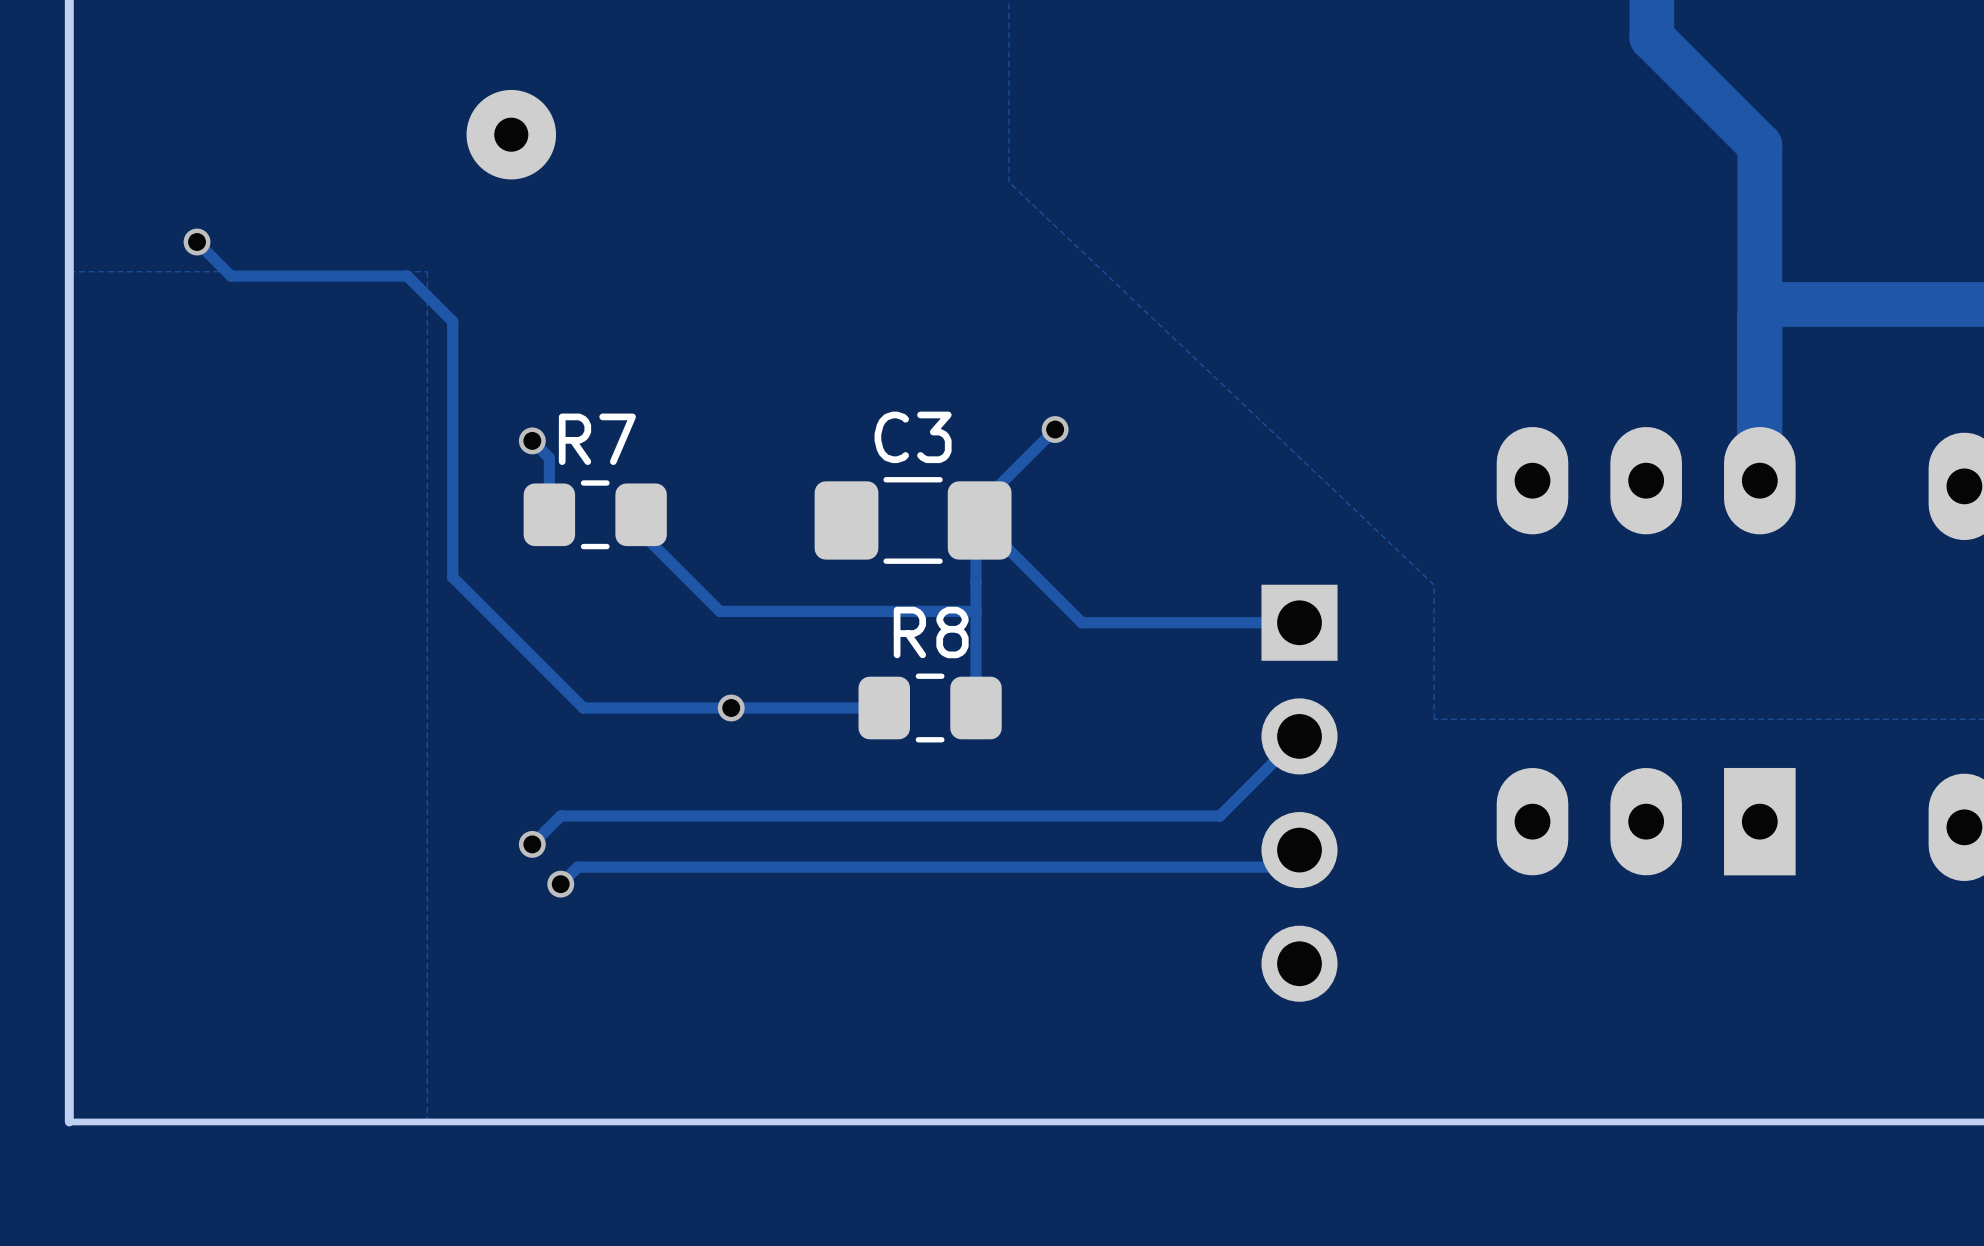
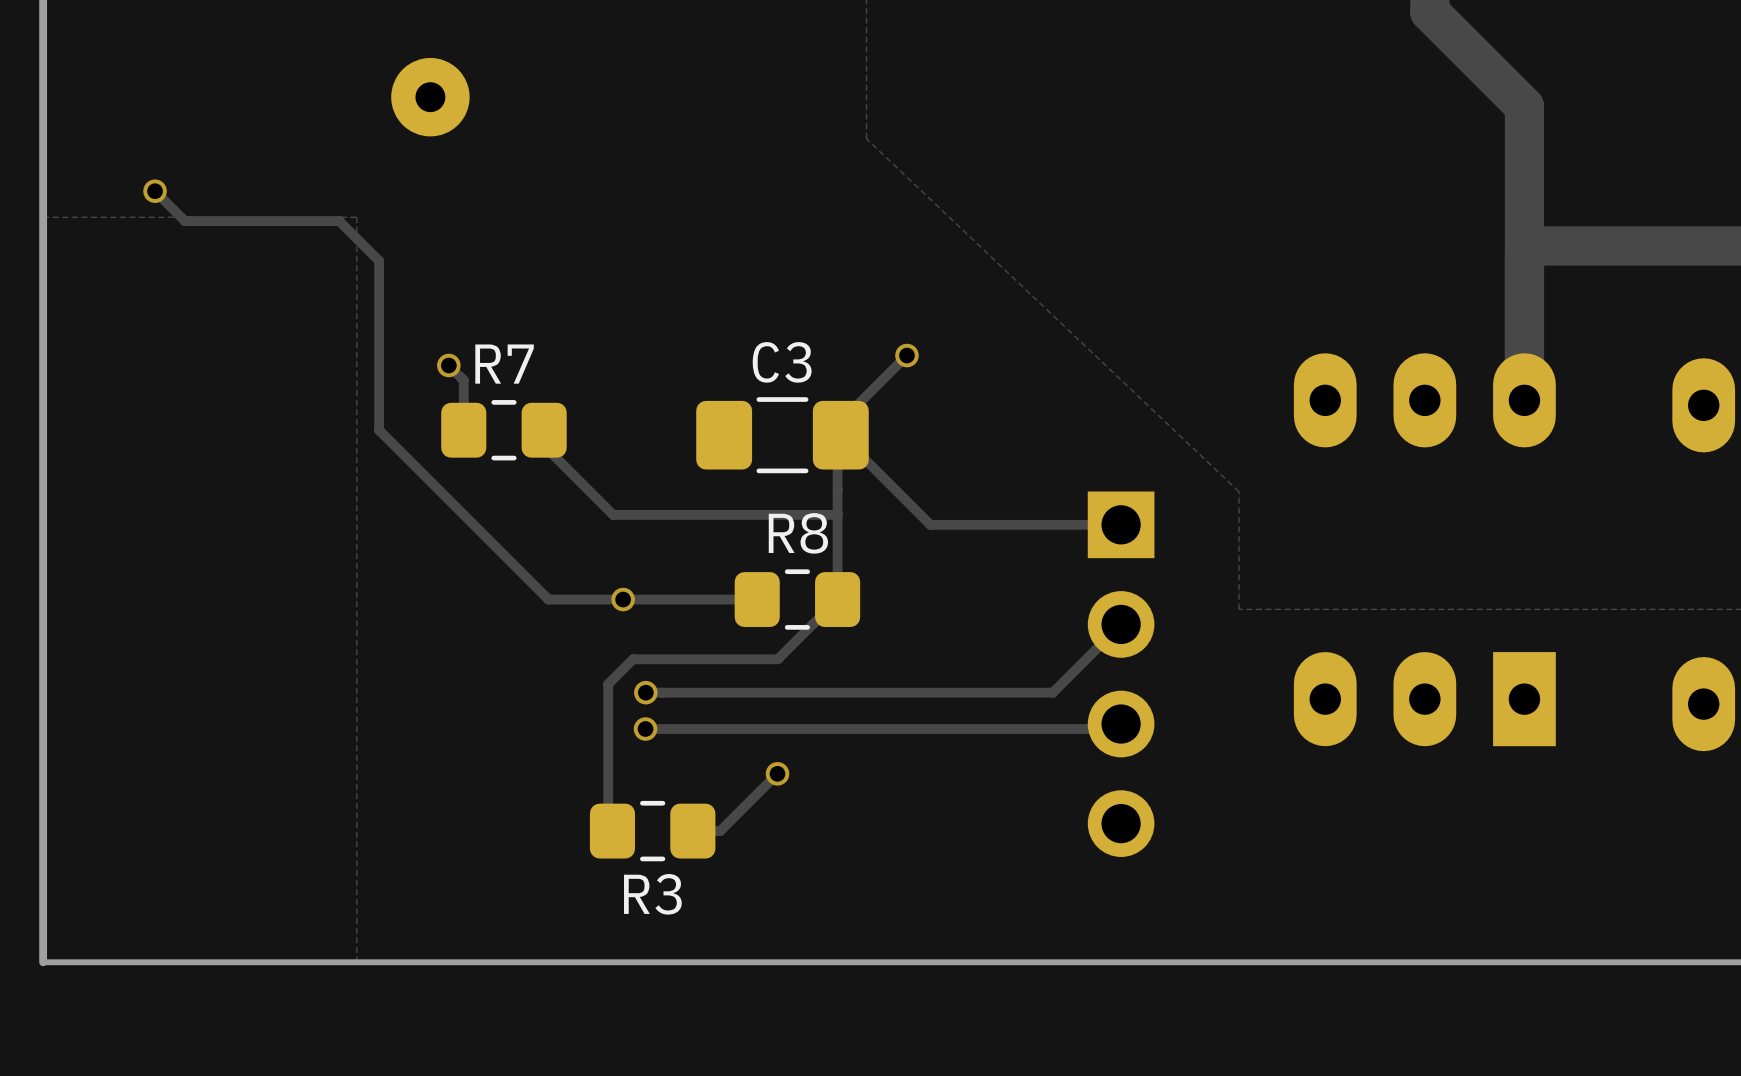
track: (452, 514) (452, 577) (583, 708) (645, 708) -> (379, 430) (548, 599)
track: none -> (837, 599) (777, 659) (633, 659) (608, 684) (608, 821) (612, 825) (612, 831)
via: none -> (645, 692)
track: (1221, 814) (1219, 815) (560, 815) (532, 844) -> (1052, 692) (645, 692)
via: (532, 844) -> none
via: none -> (645, 729)
track: (1293, 855) (1282, 867) (577, 867) (560, 884) -> (1116, 729) (645, 729)
via: (560, 884) -> none
track: none -> (777, 773) (720, 831) (692, 831)
via: none -> (777, 773)
R3: none -> (652, 831)

